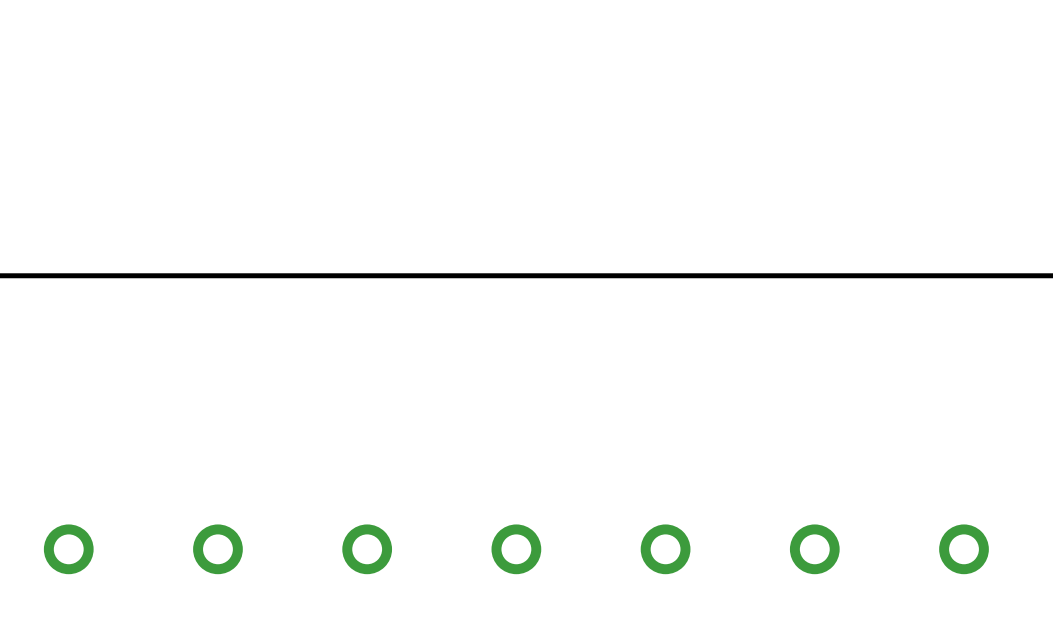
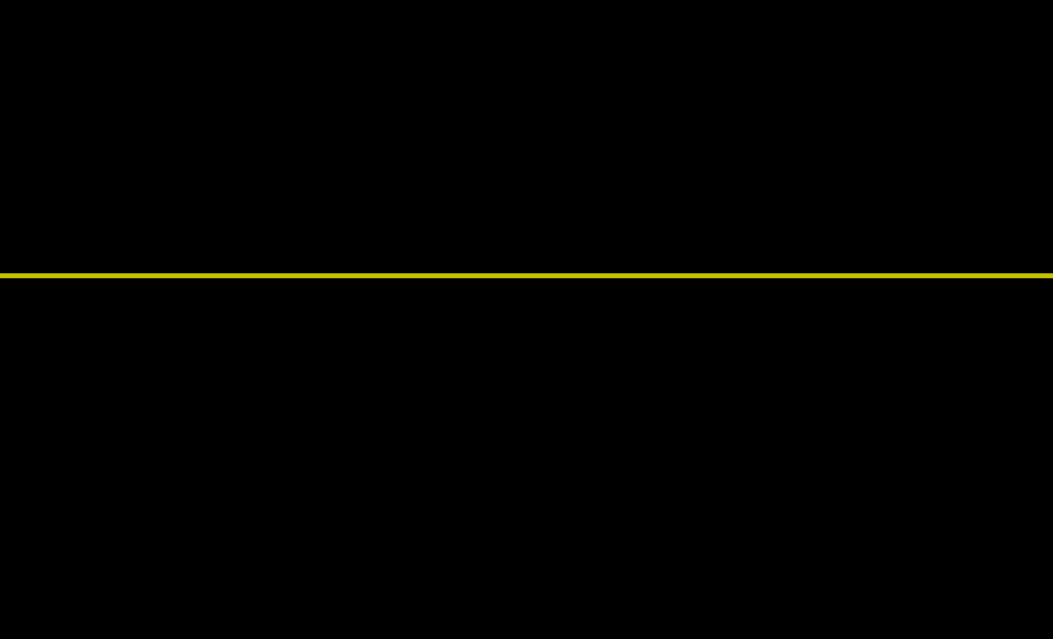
via: (68, 549) -> none
via: (217, 549) -> none
via: (367, 549) -> none
via: (516, 549) -> none
via: (665, 549) -> none
via: (814, 549) -> none
via: (964, 549) -> none

